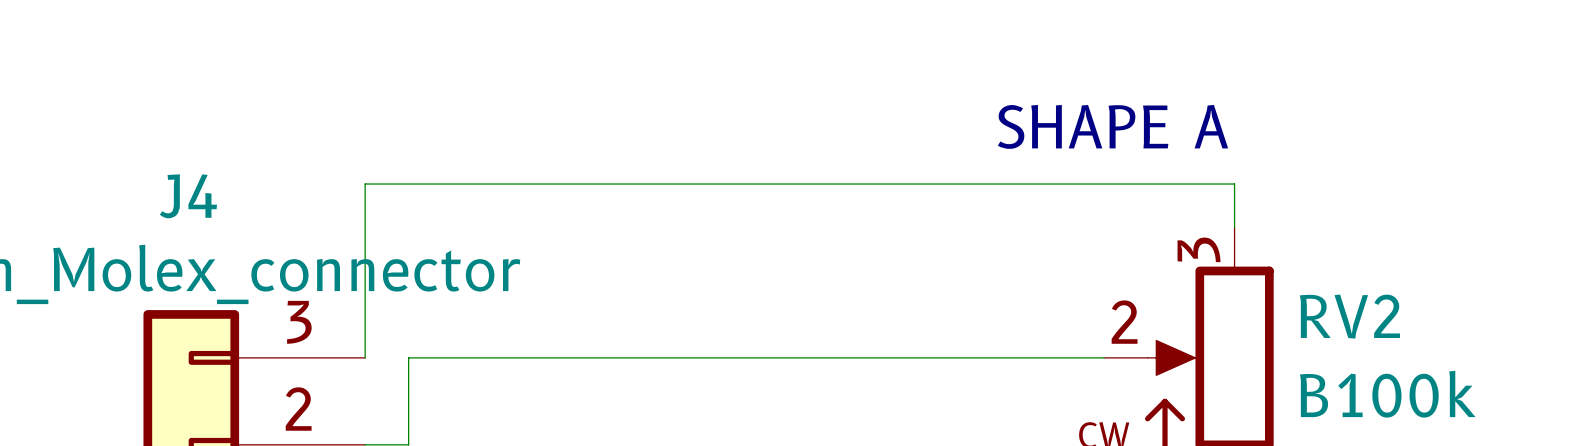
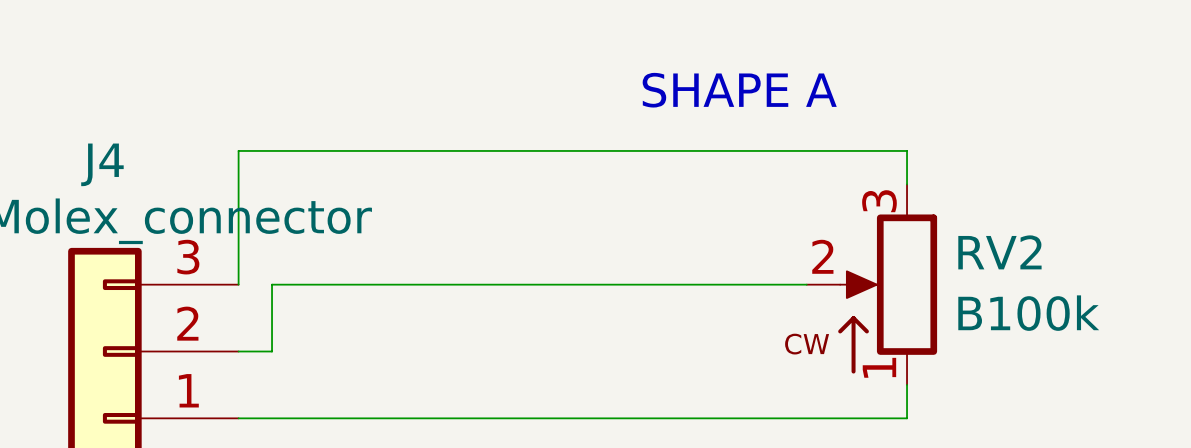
text position: SHAPE A (1112, 126) -> SHAPE A (739, 90)

